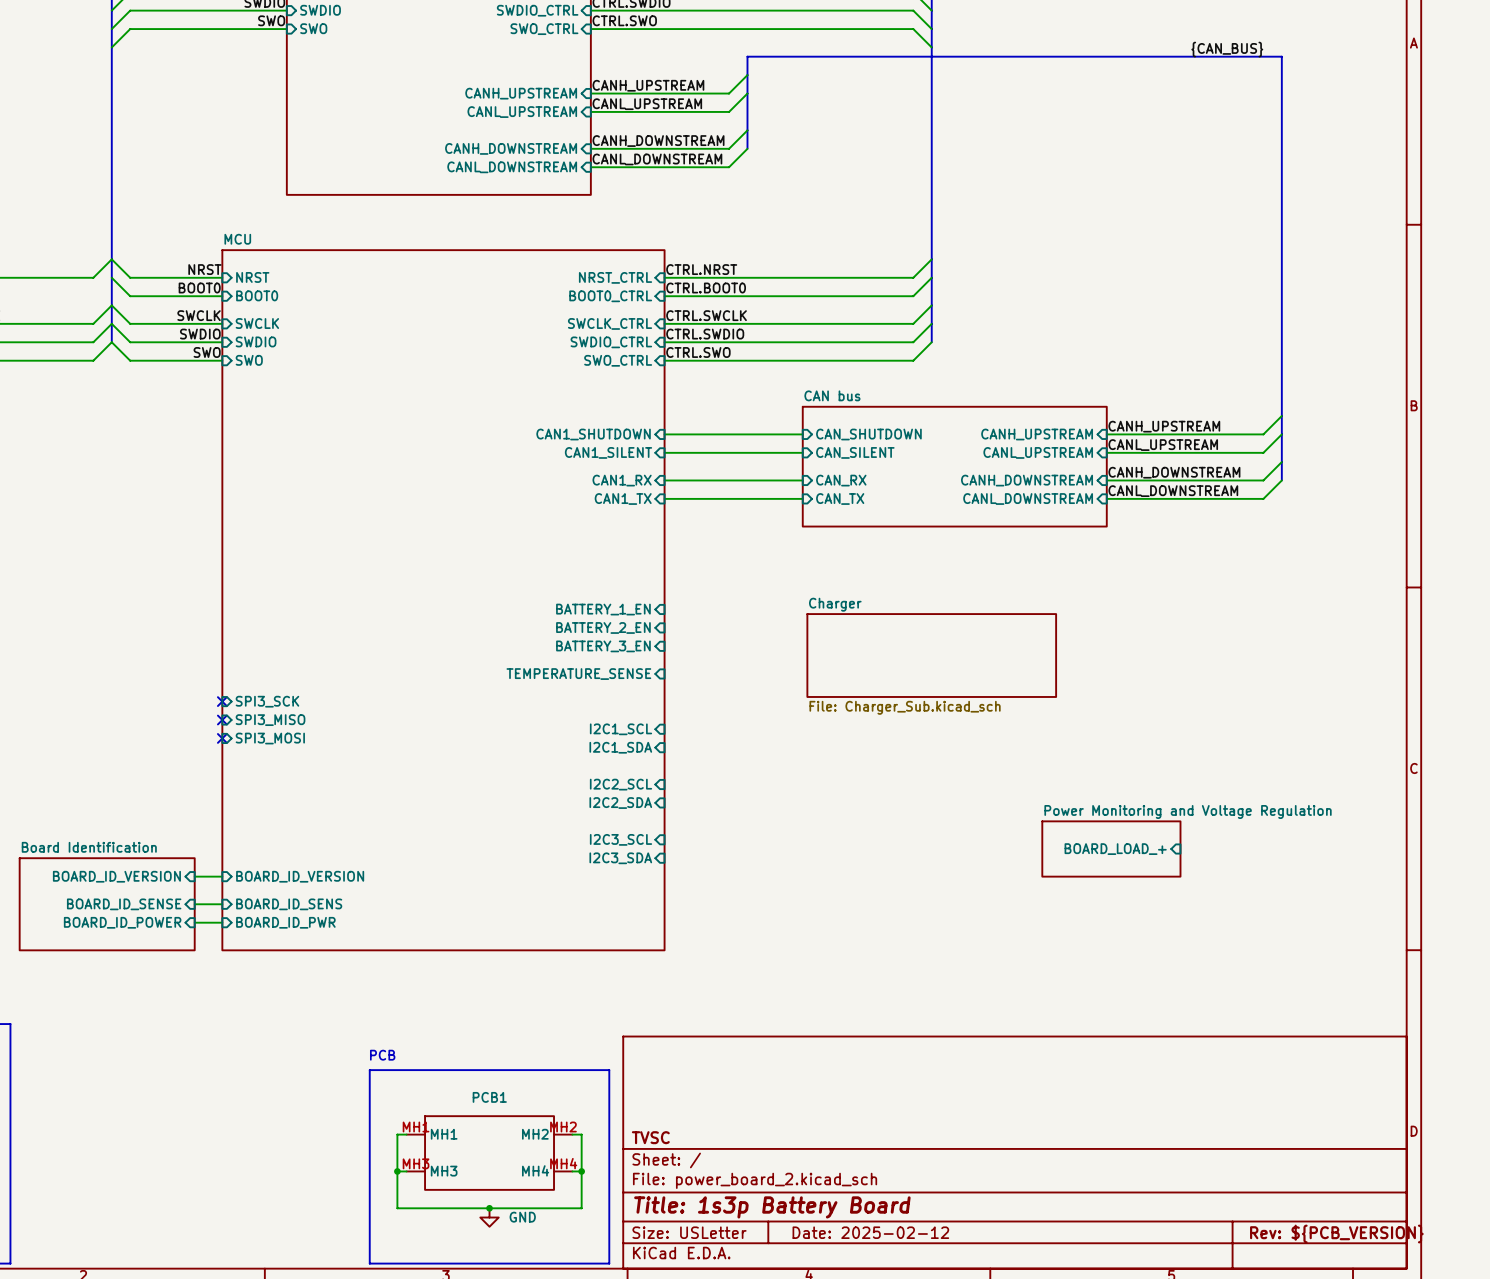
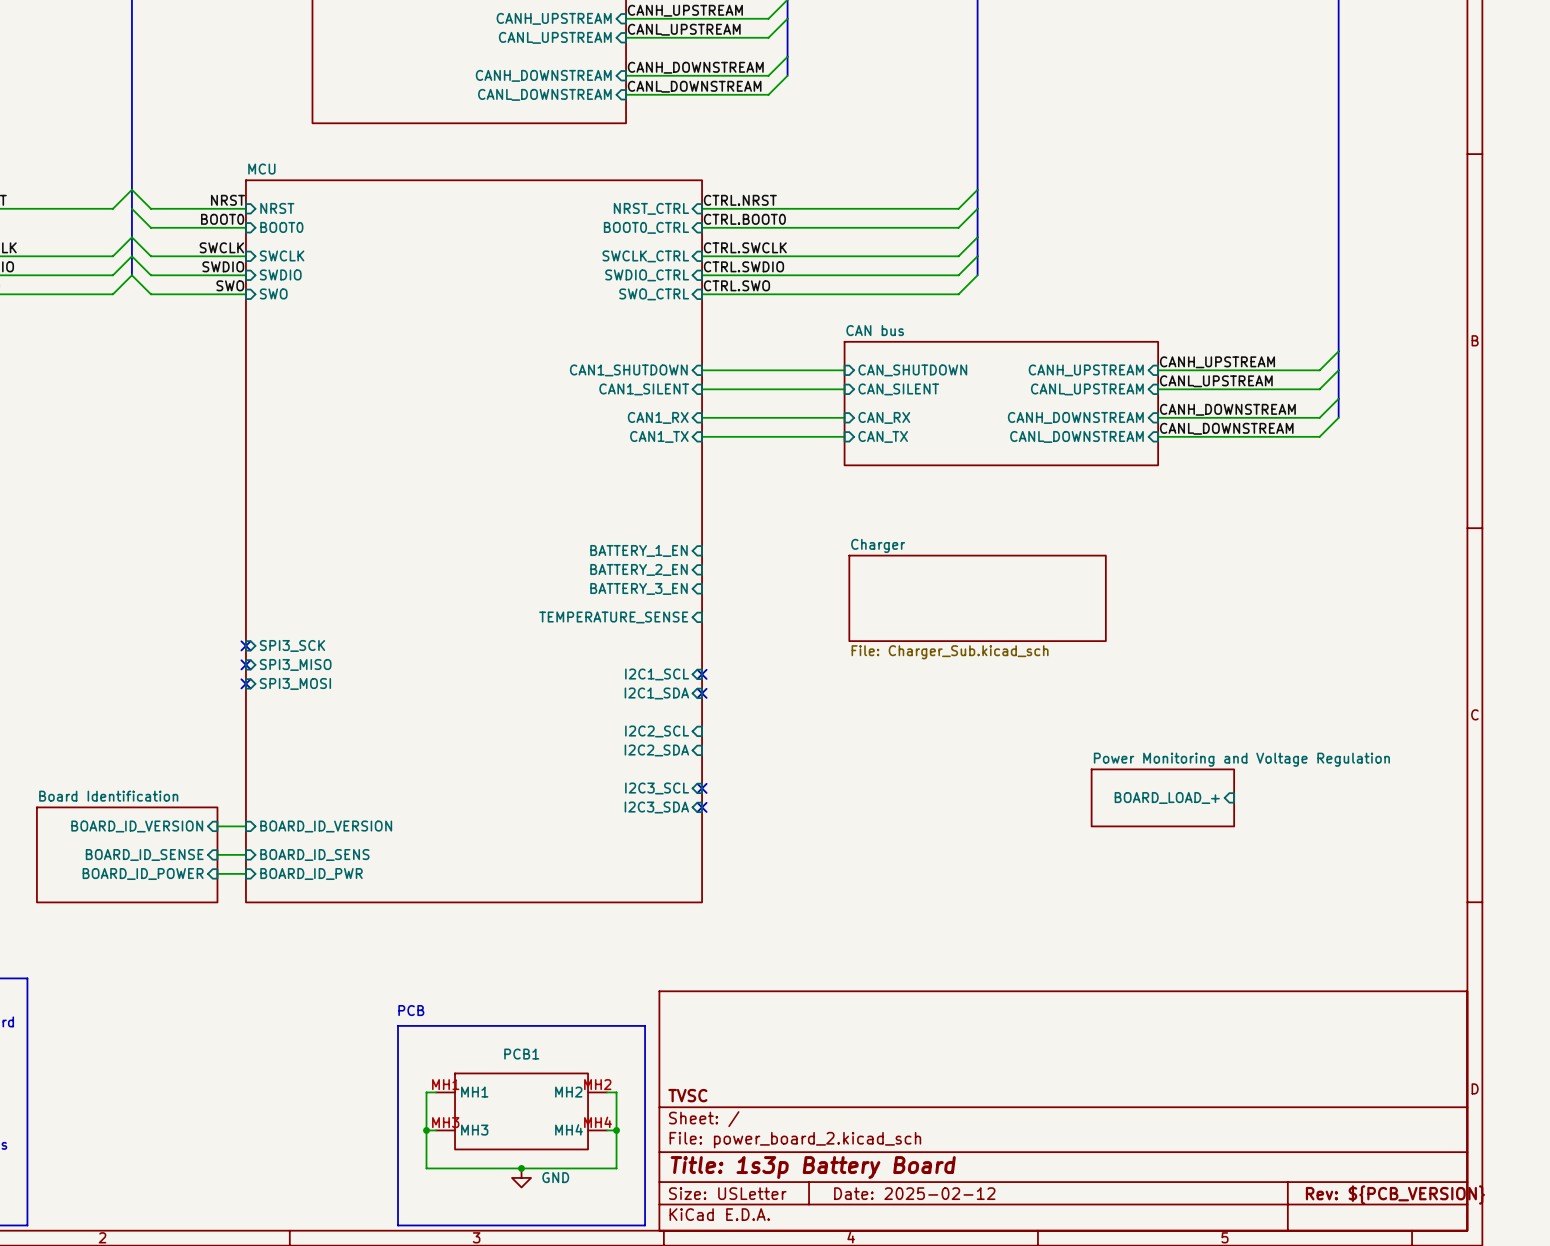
no-connect mark: none -> (702, 674)
no-connect mark: none -> (702, 693)
no-connect mark: none -> (702, 788)
no-connect mark: none -> (702, 807)

